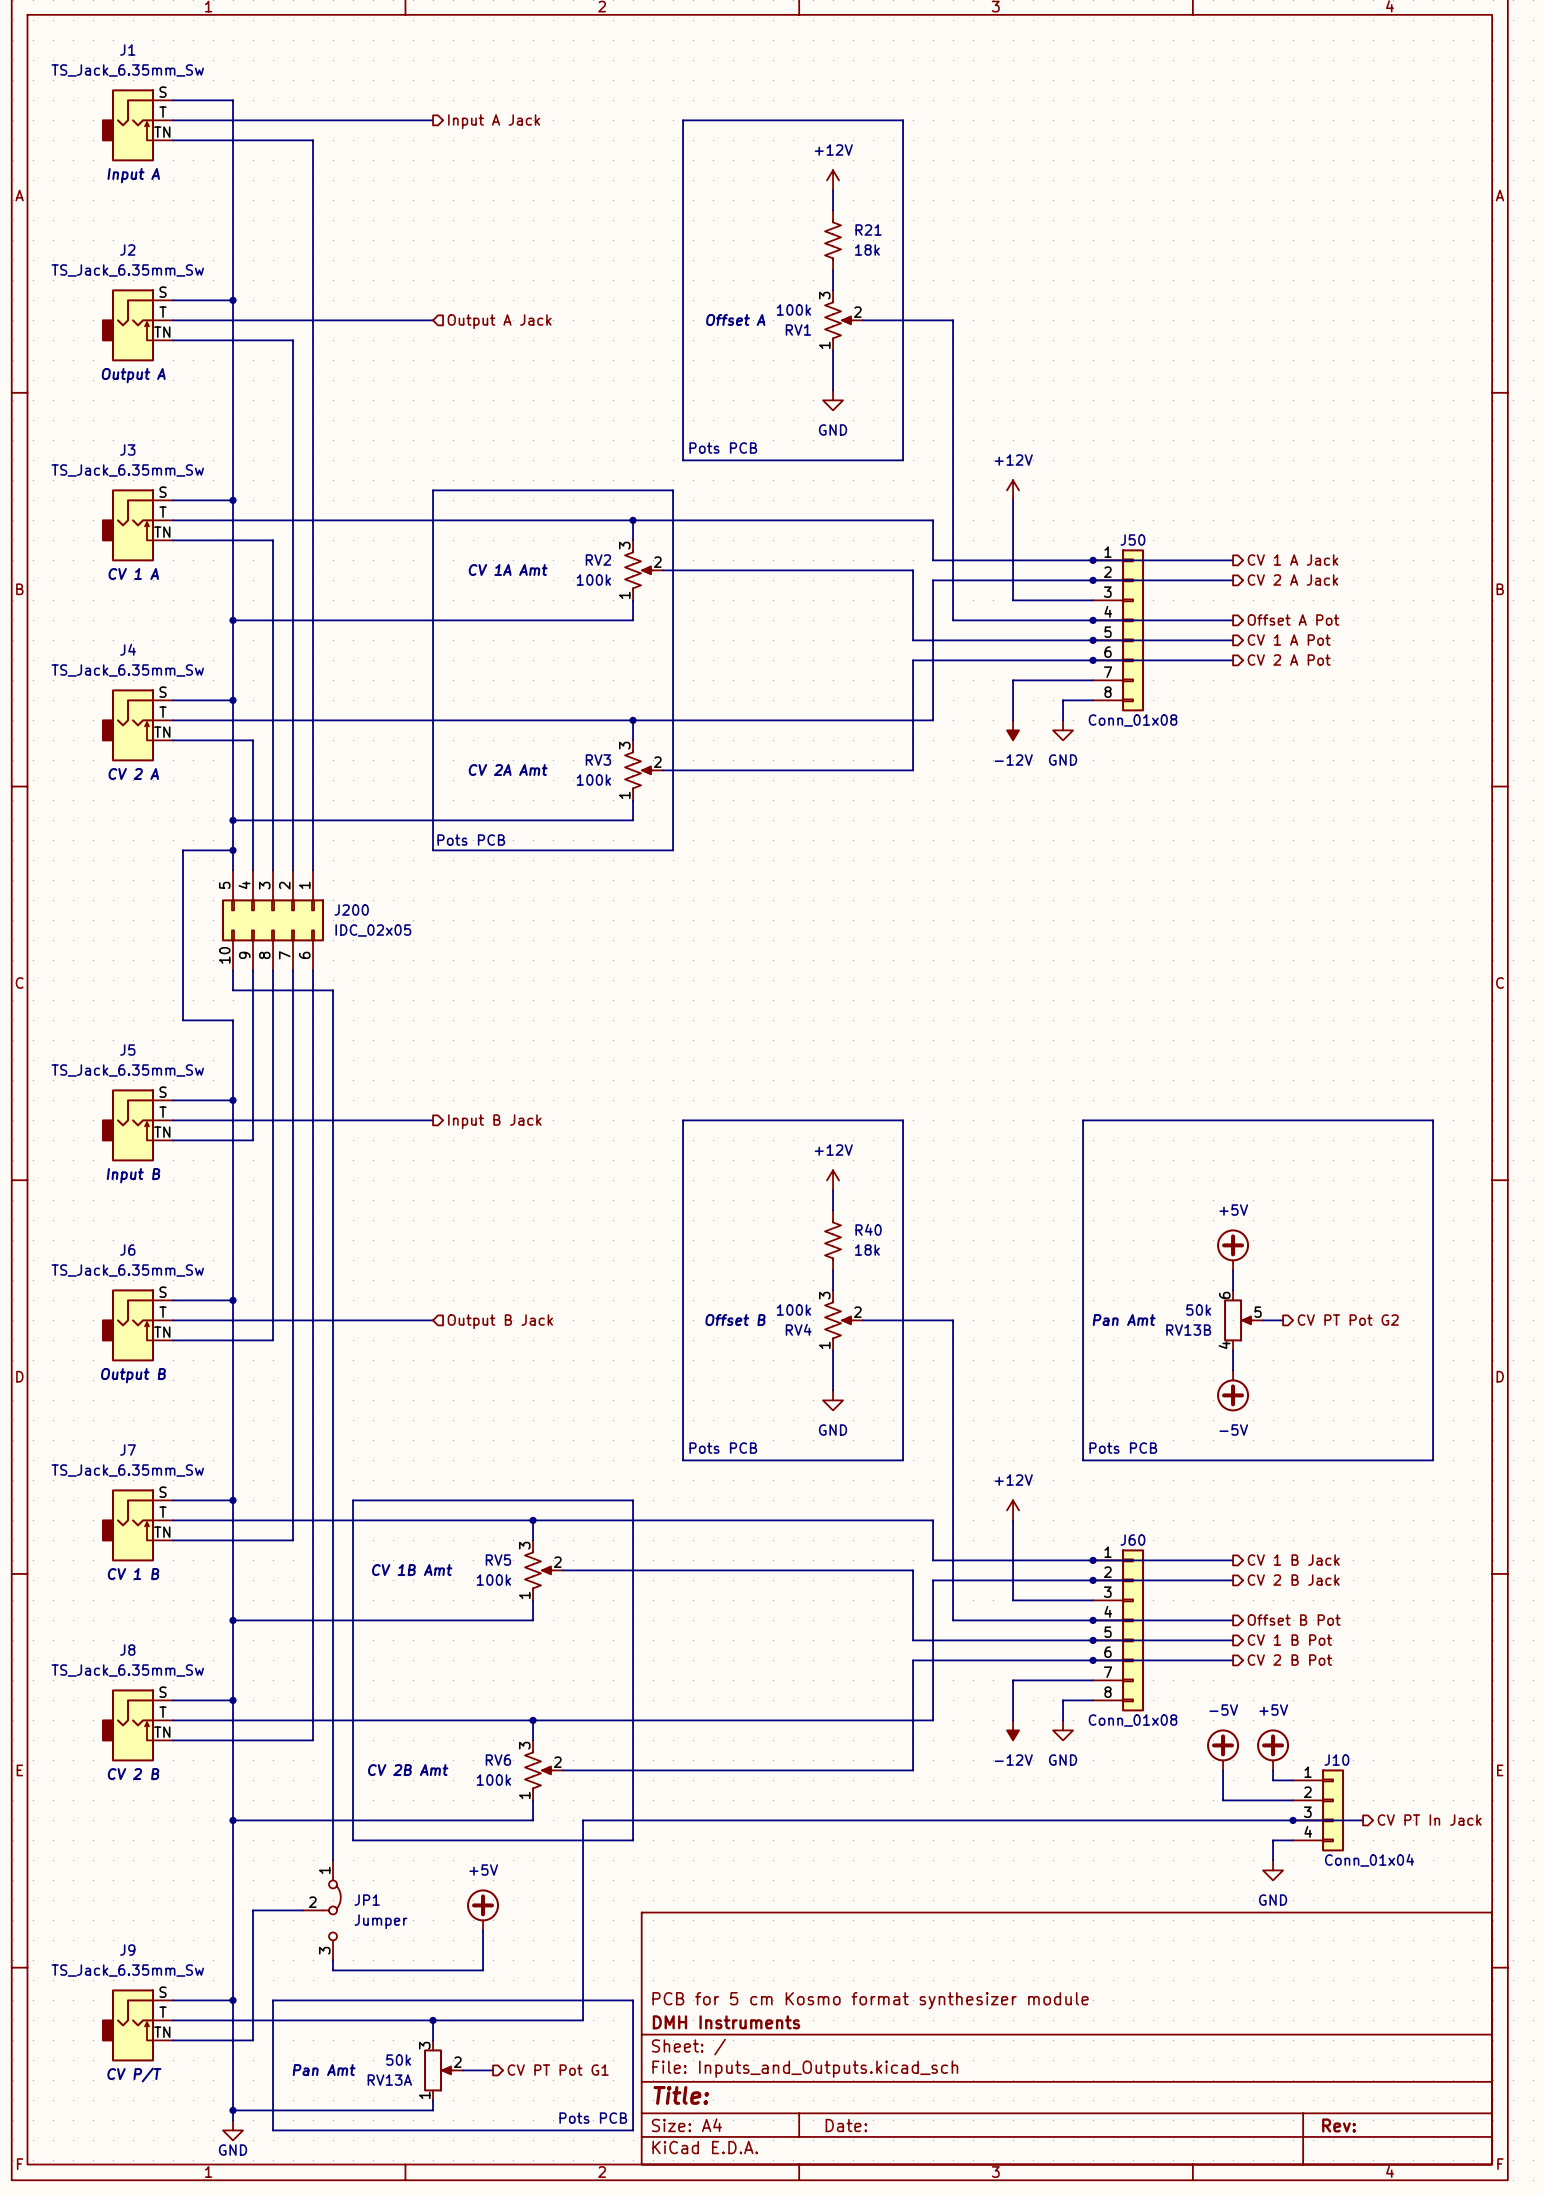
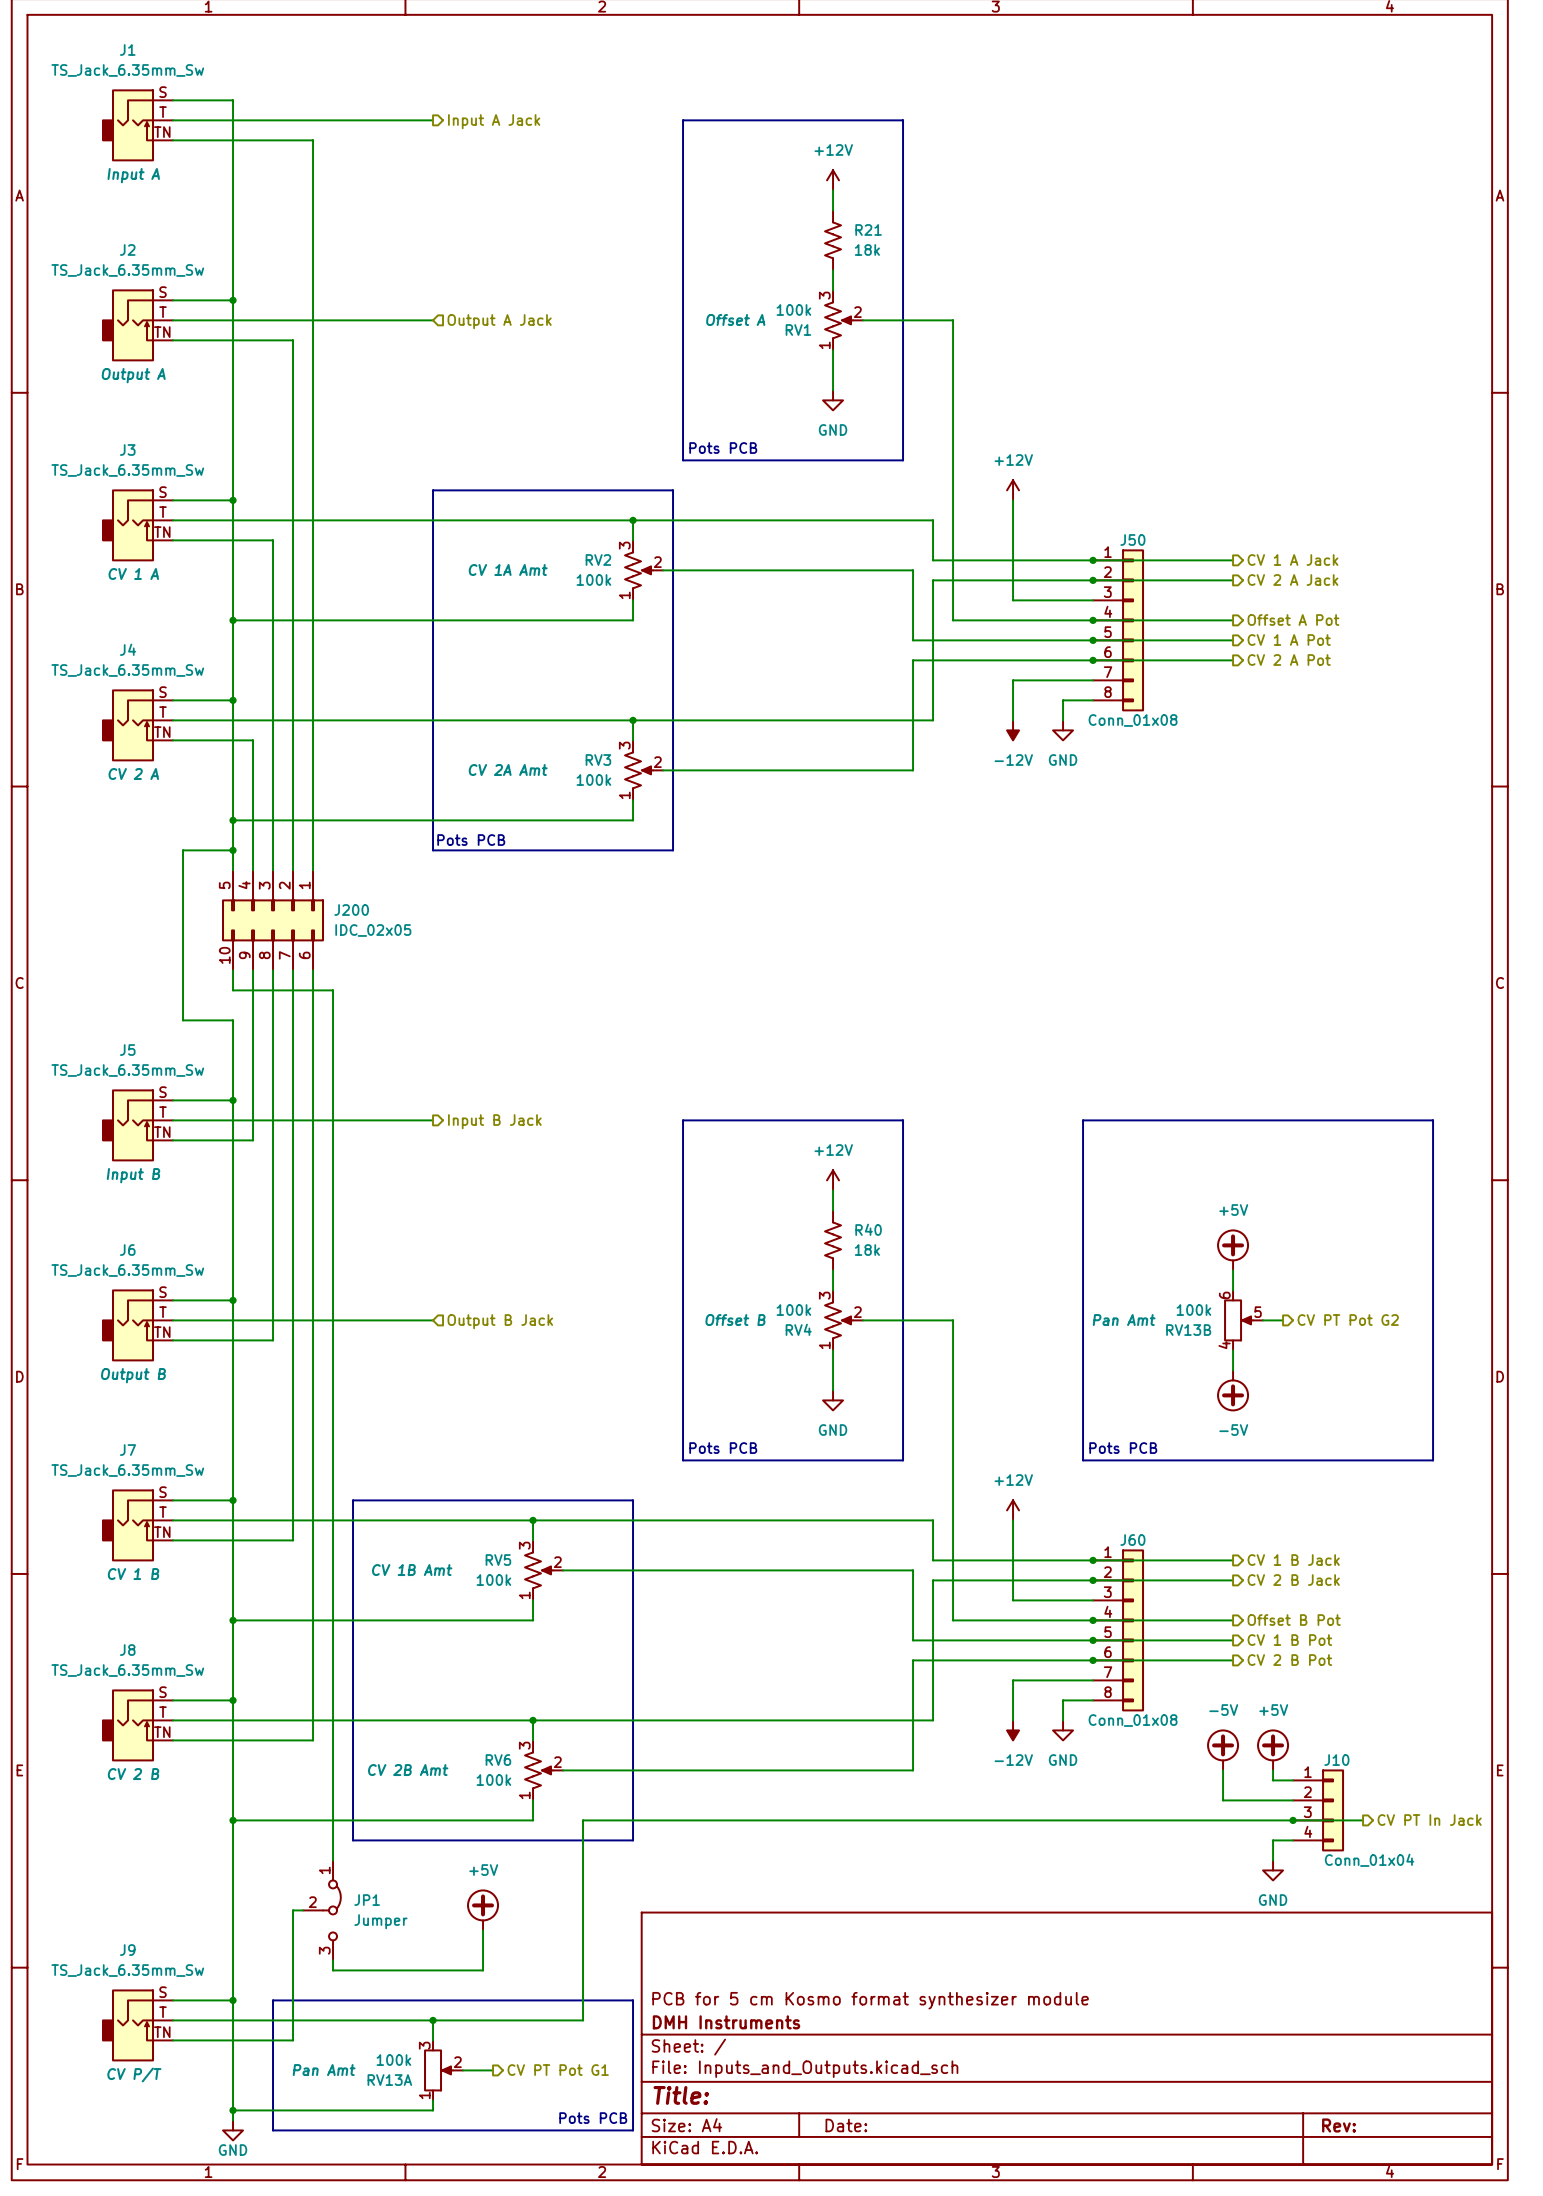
RV13B value: 50k (1198, 1310) -> 100k (1193, 1310)
wire: (293, 1910) (253, 1910) (253, 2040) -> (293, 1910) (293, 2040) (253, 2040)
RV13A value: 50k (398, 2060) -> 100k (393, 2060)

